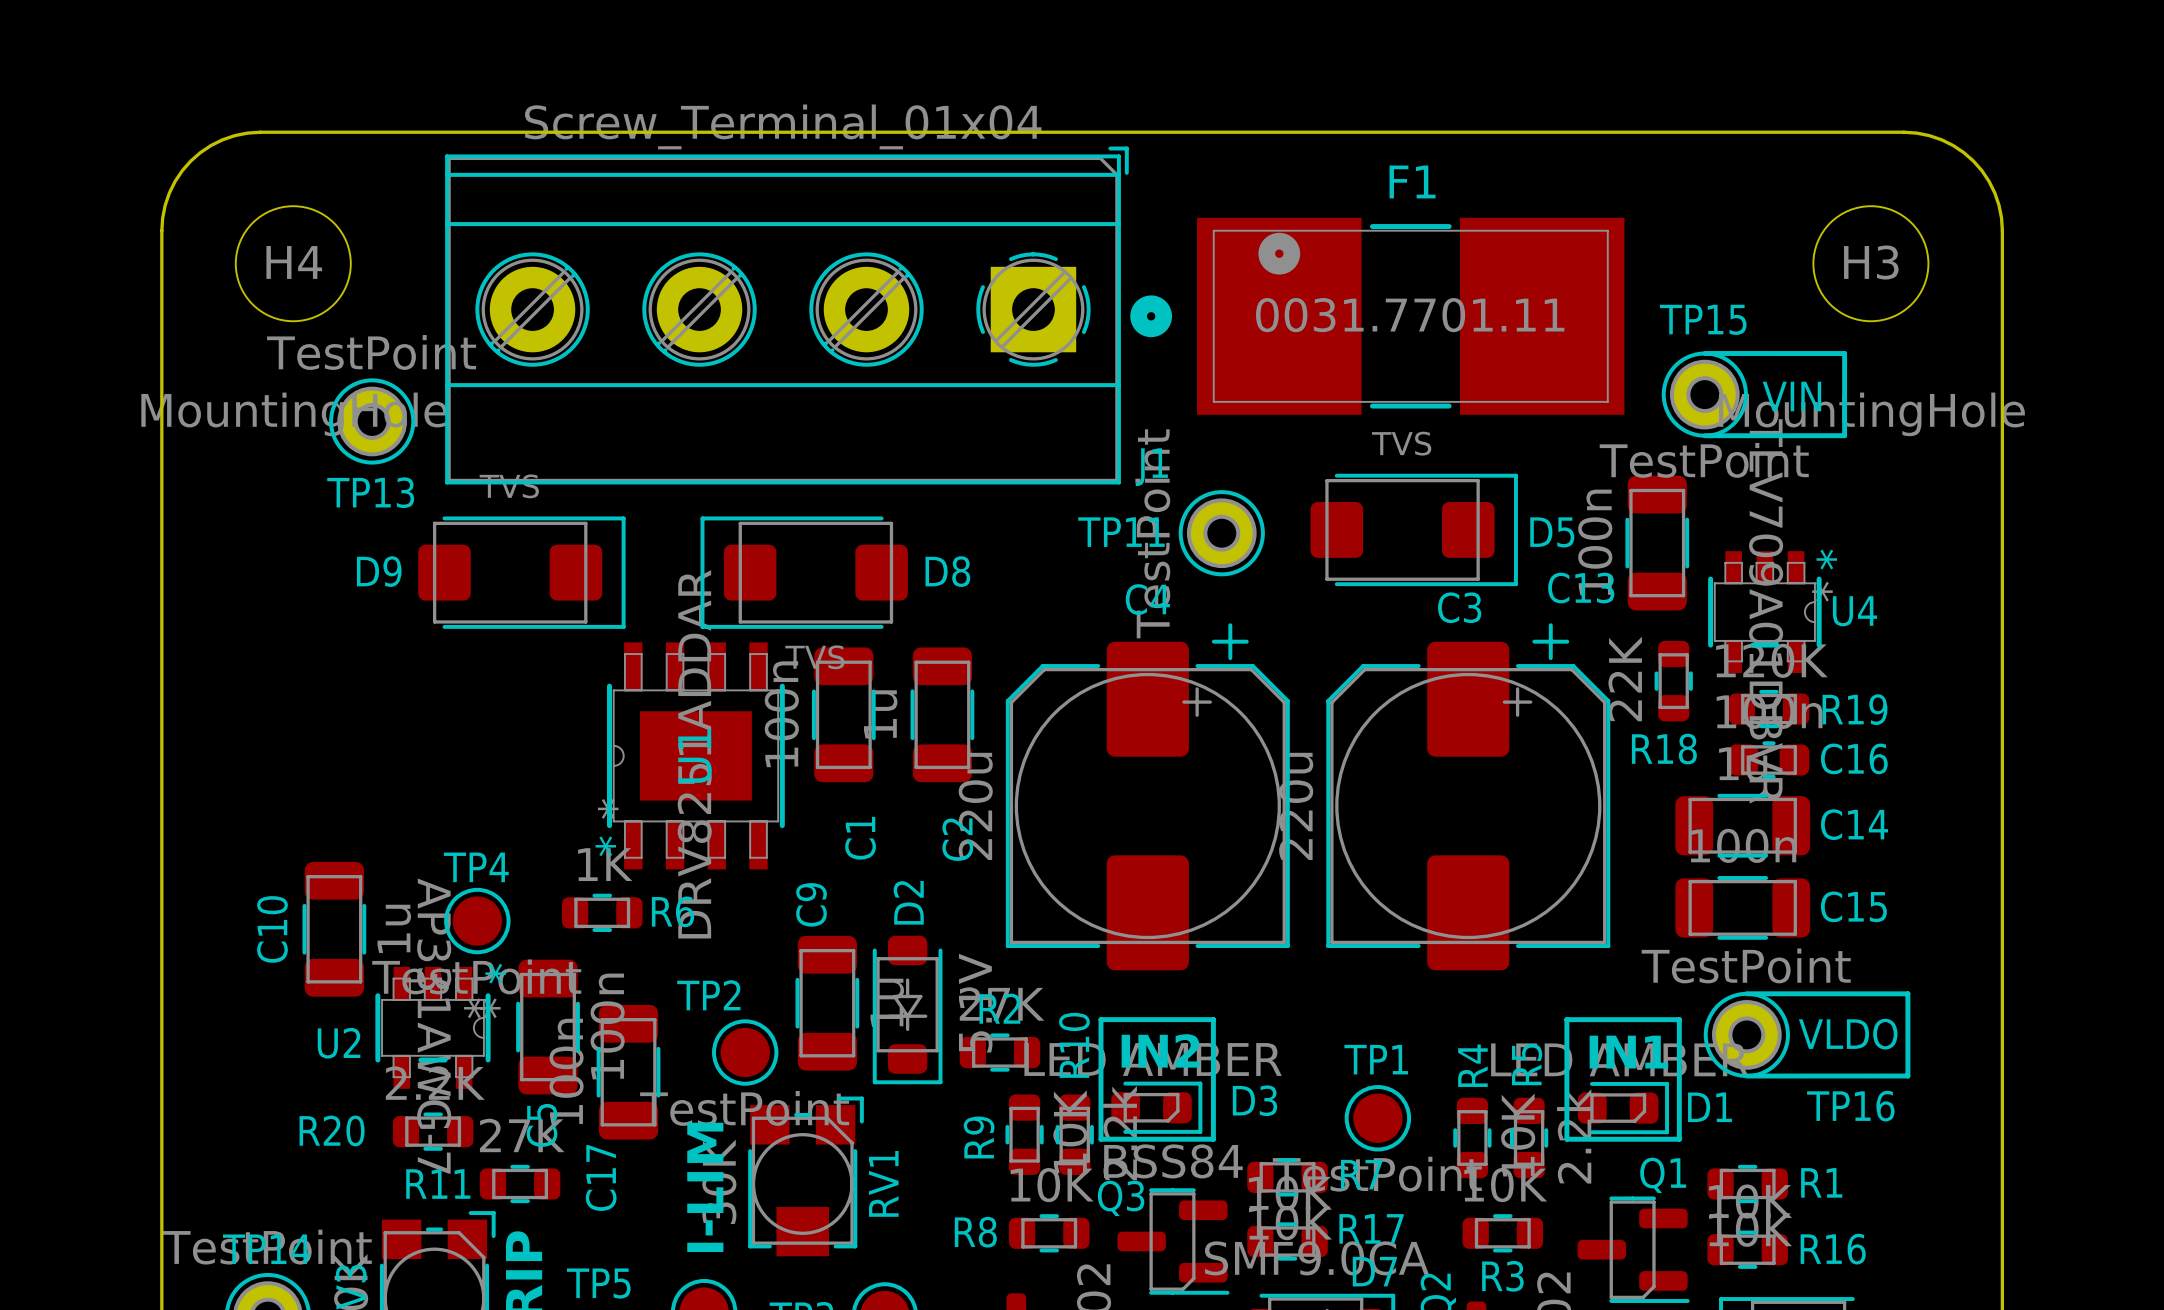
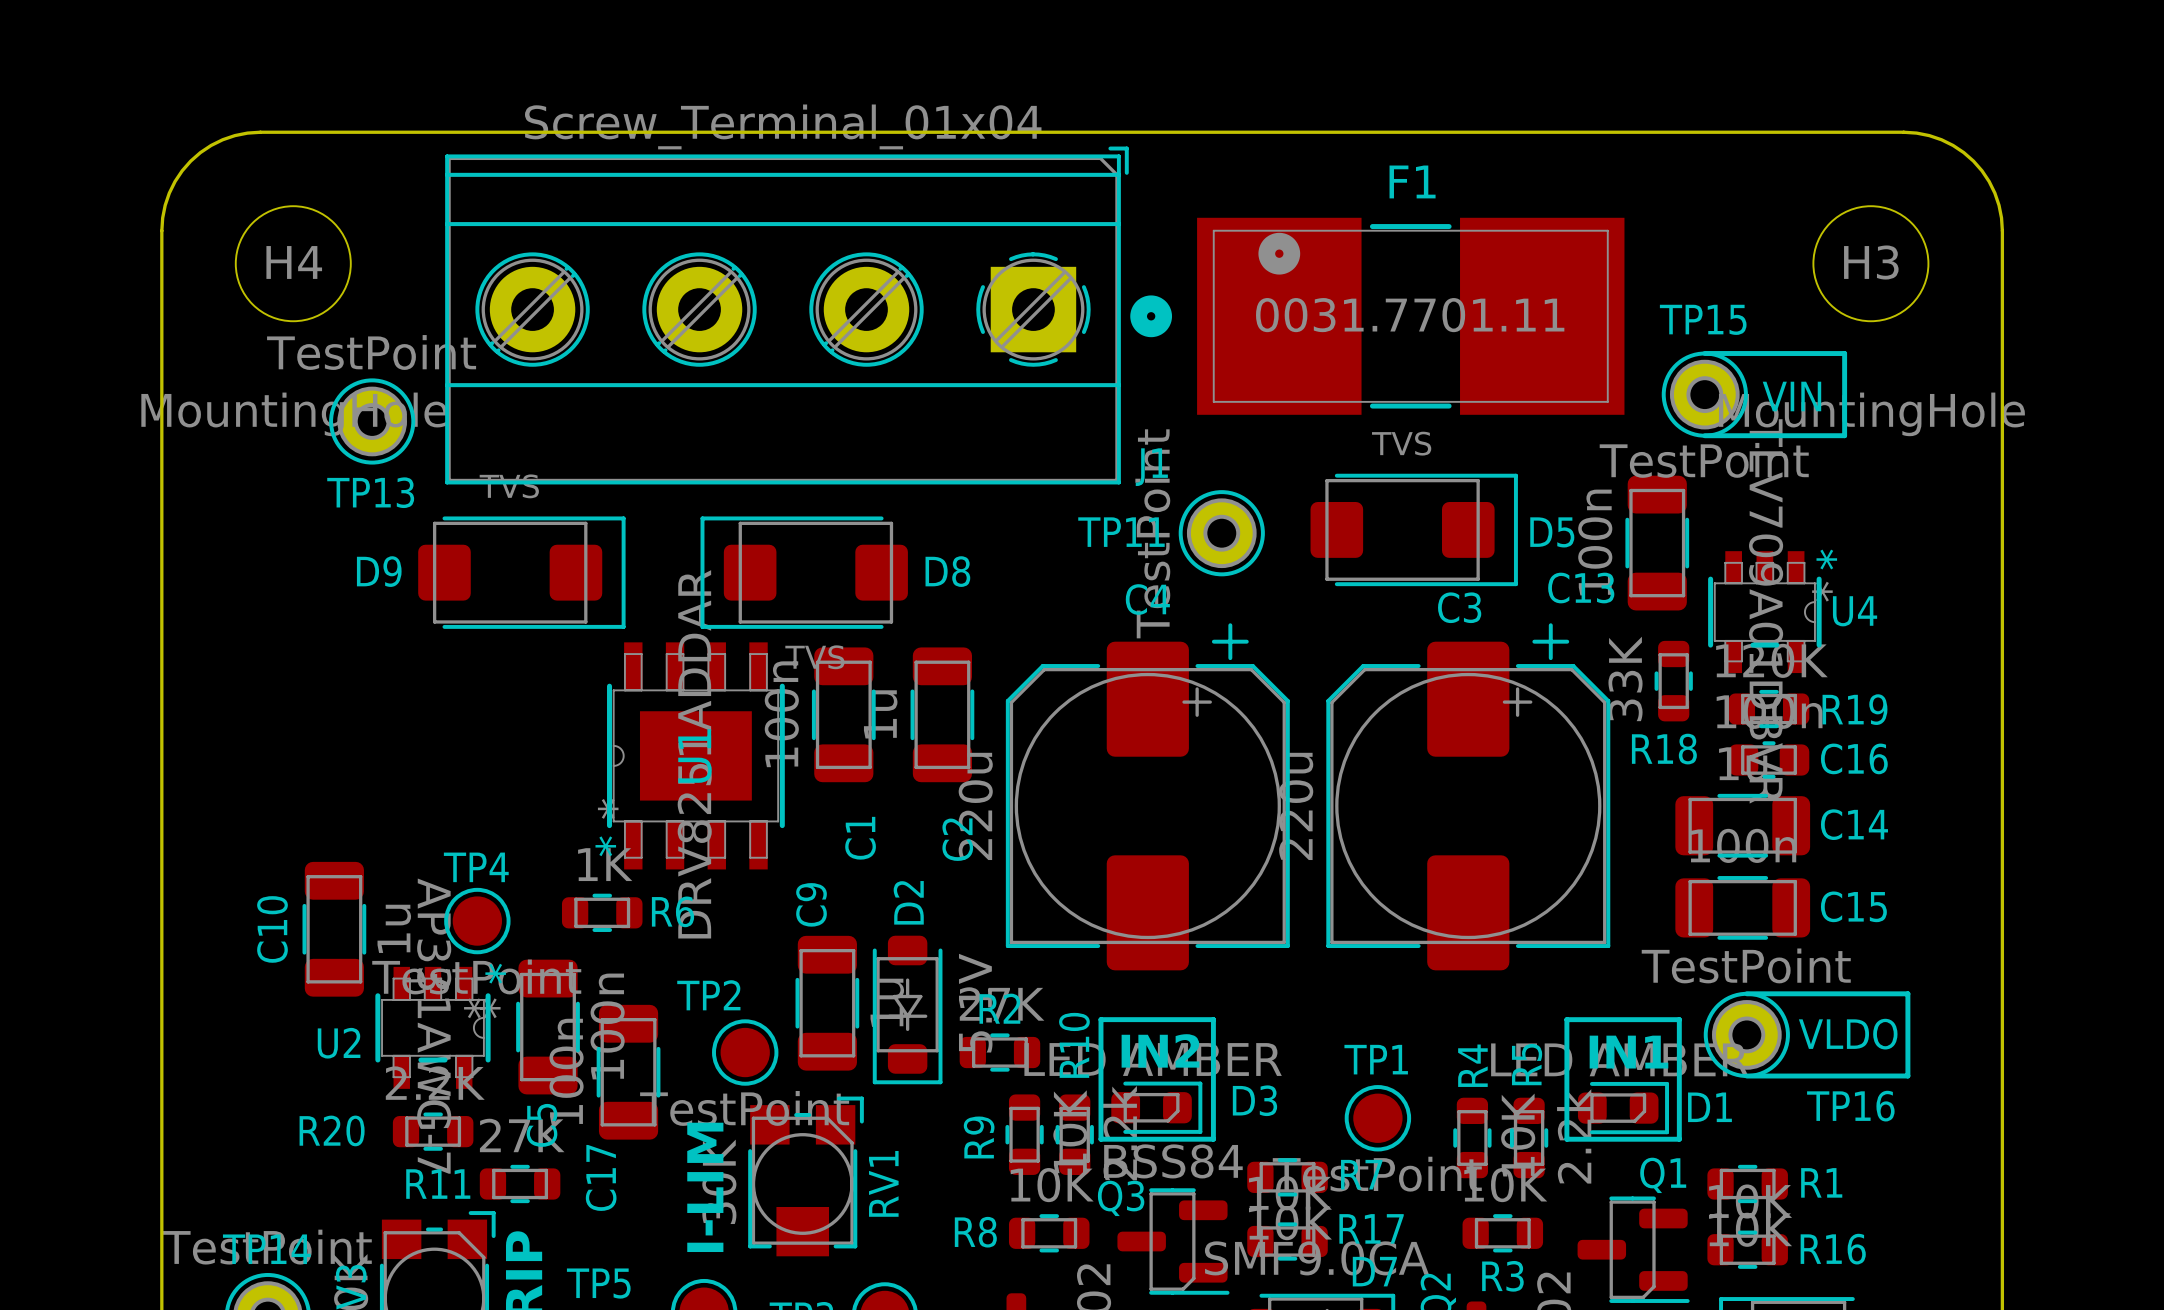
R18 value: 22K (1625, 679) -> 33K (1625, 678)

